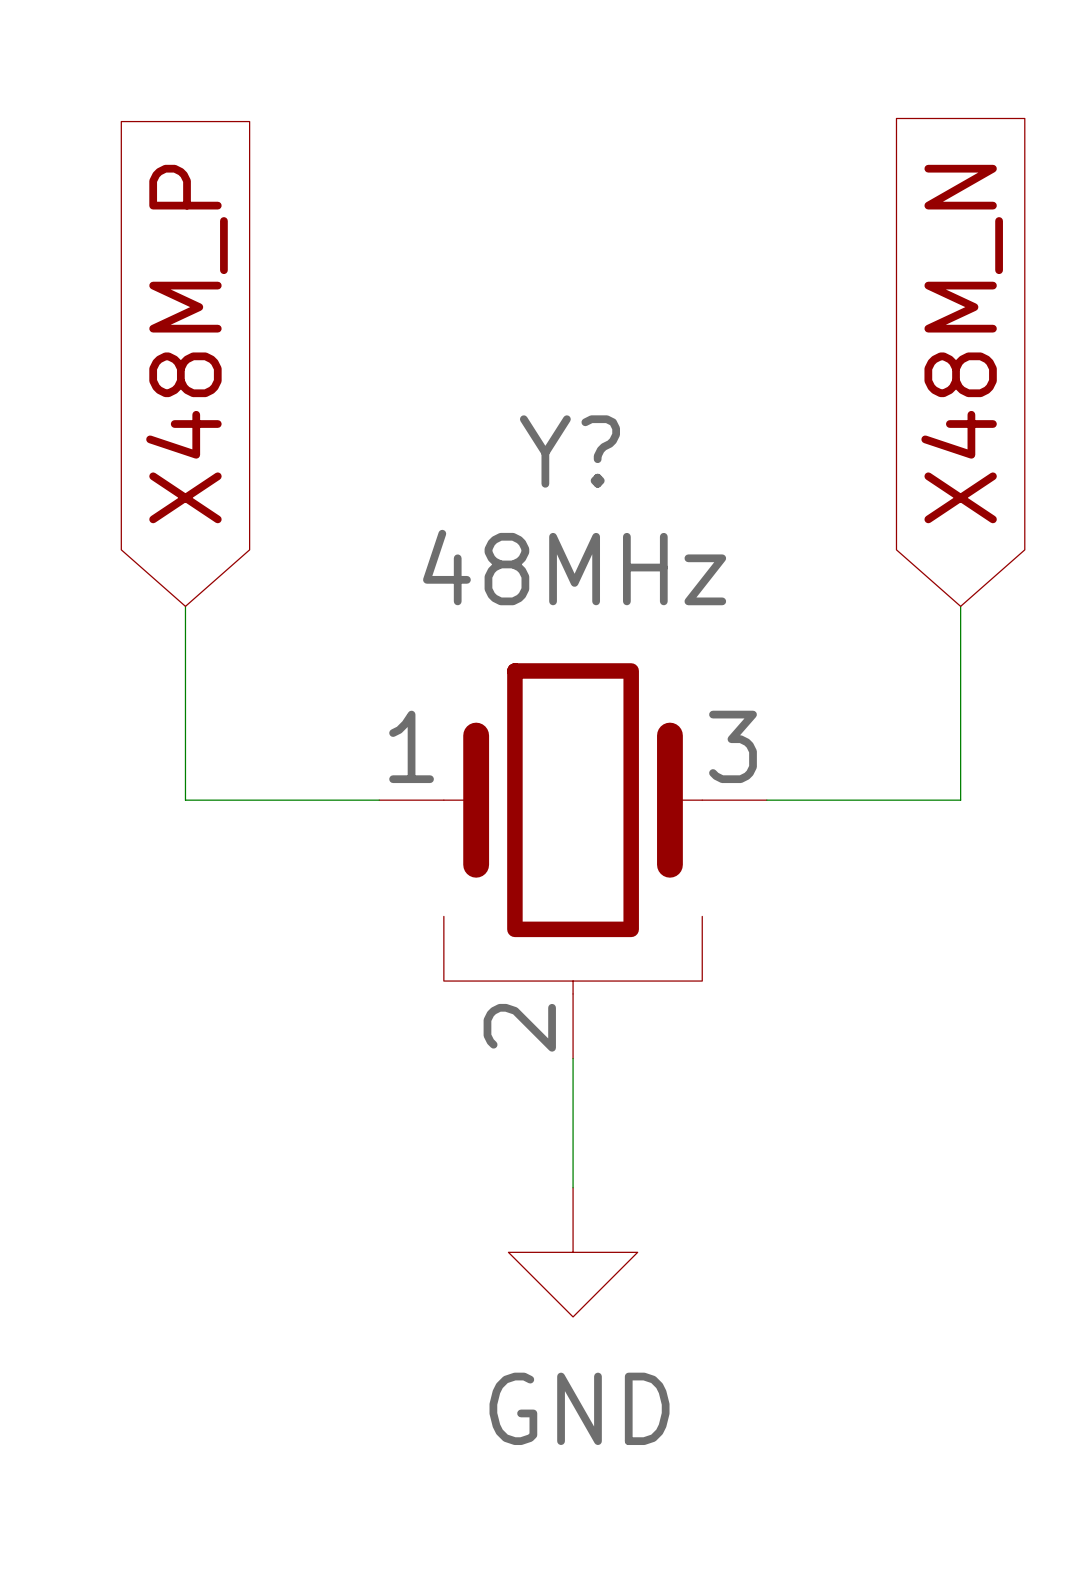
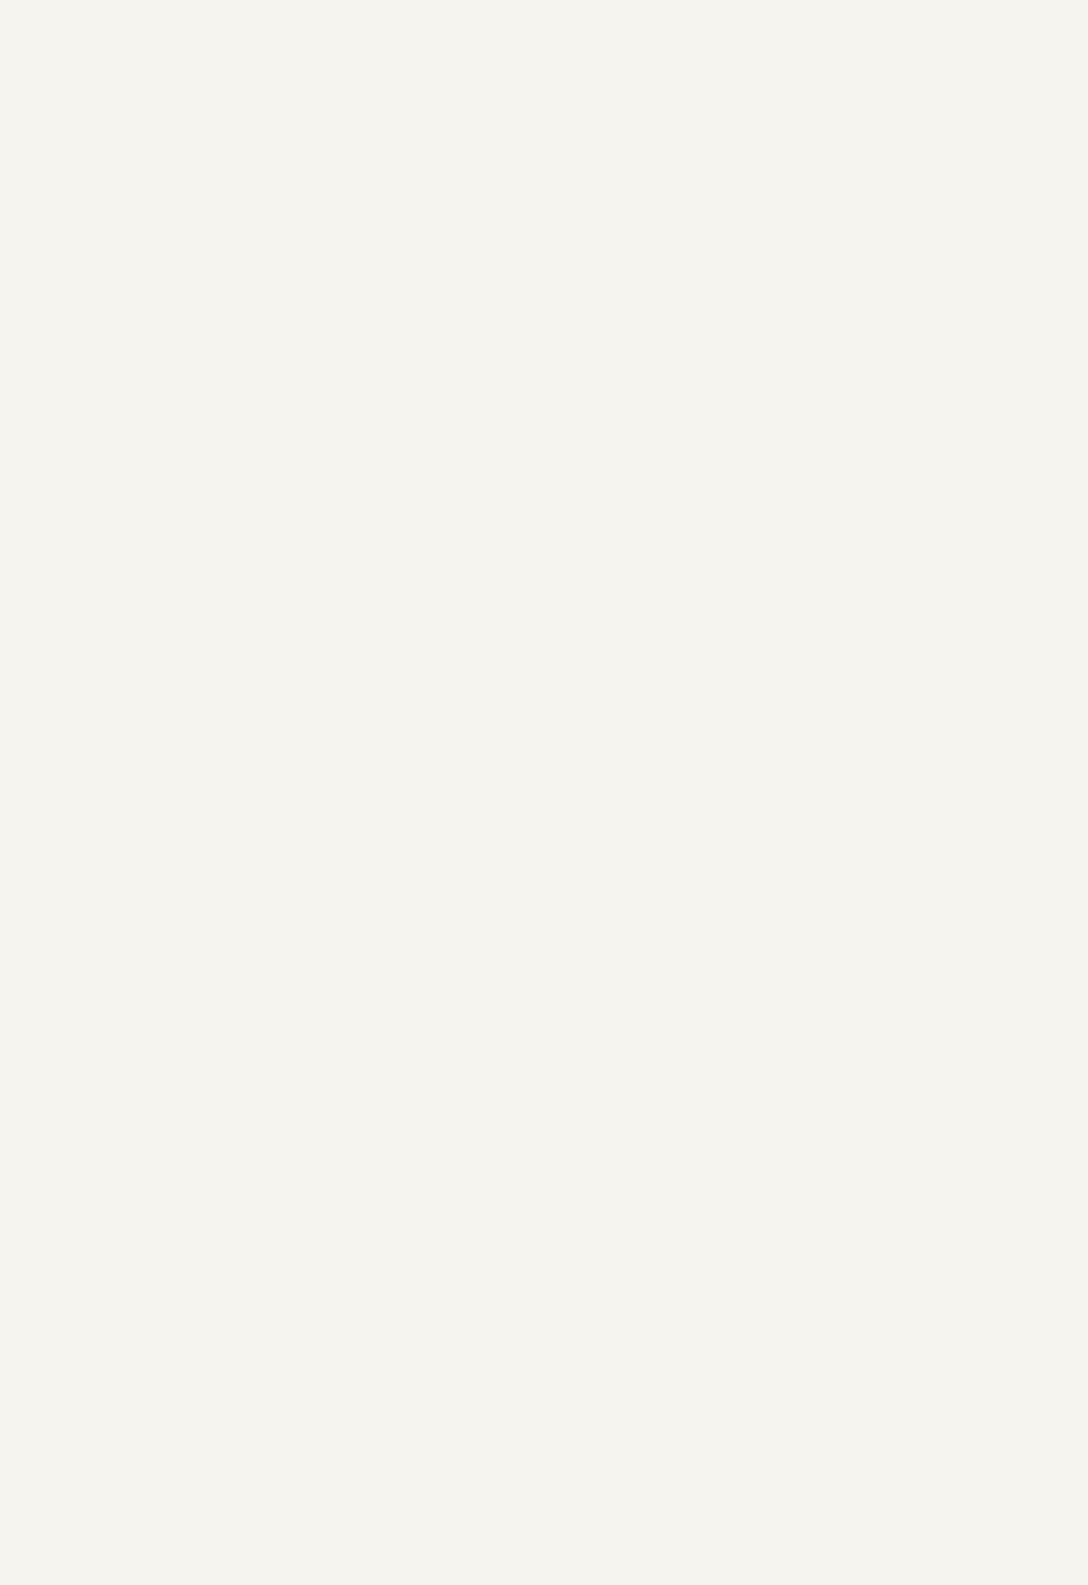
global label: X48M_P (187, 344) -> none
global label: X48M_N (962, 344) -> none
wire: (185, 606) (185, 800) (379, 800) -> none
wire: (960, 606) (960, 800) (766, 800) -> none
Y?: 48MHz (573, 860) -> none
wire: (573, 1058) (573, 1187) -> none
power symbol: GND (573, 1252) -> none

